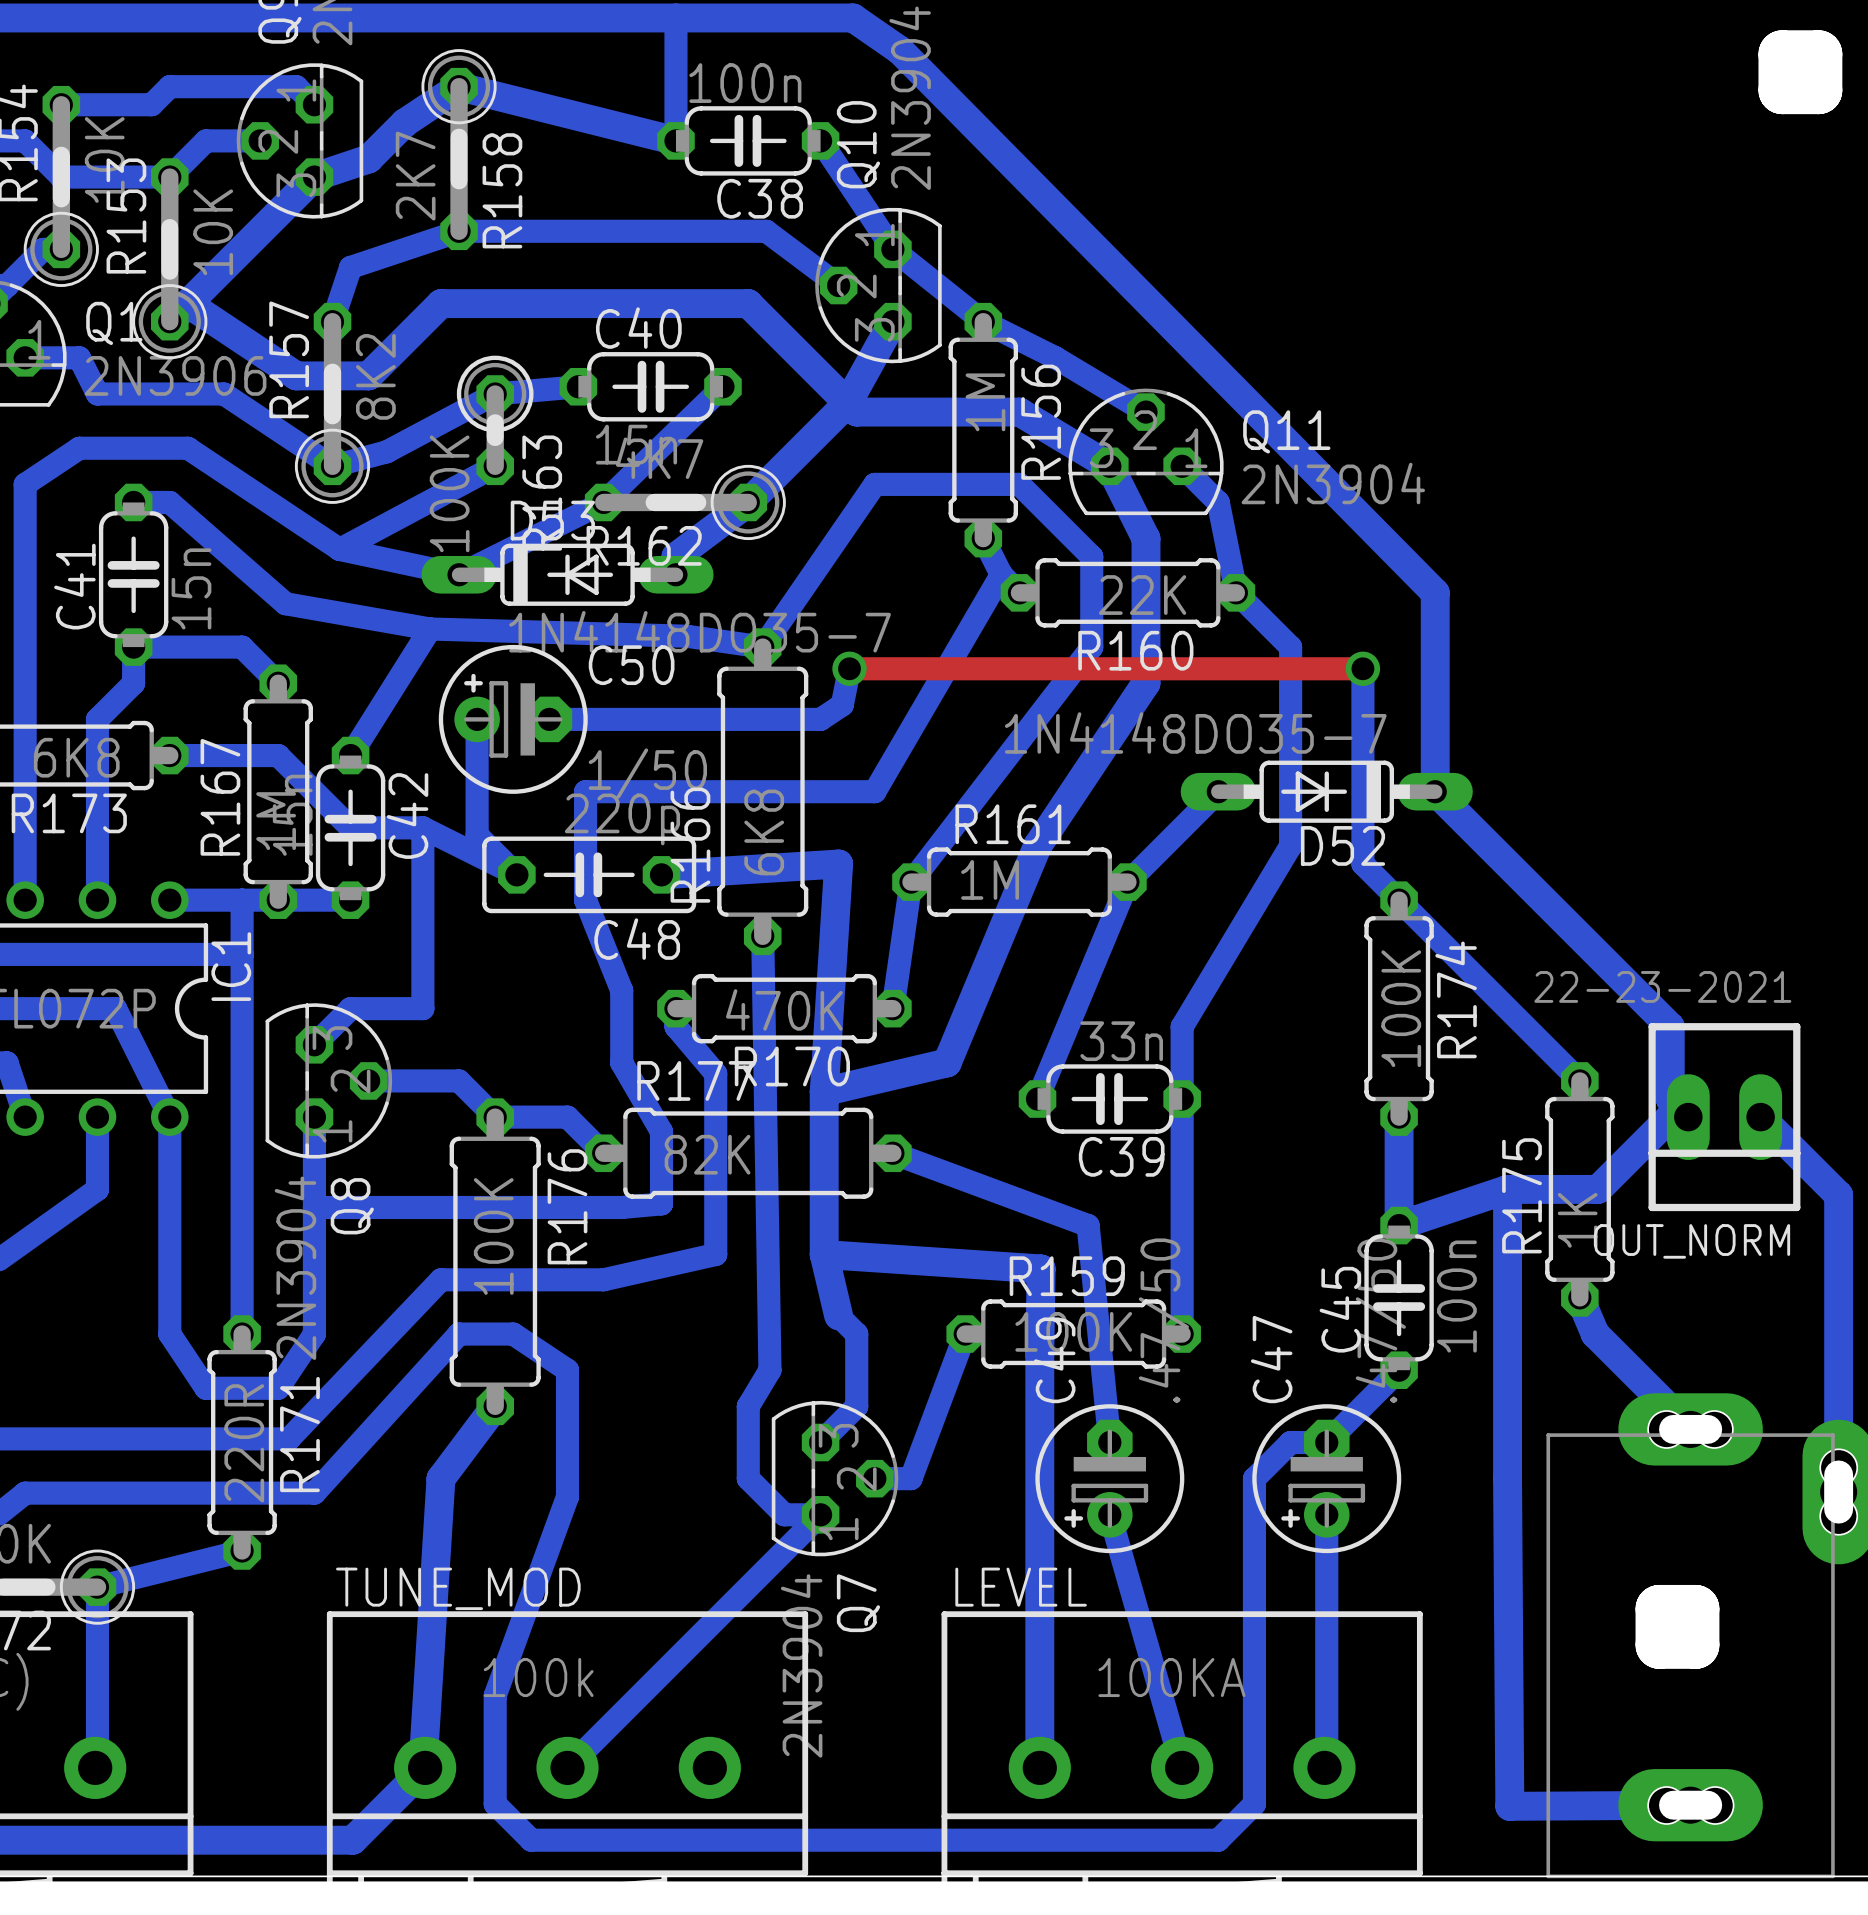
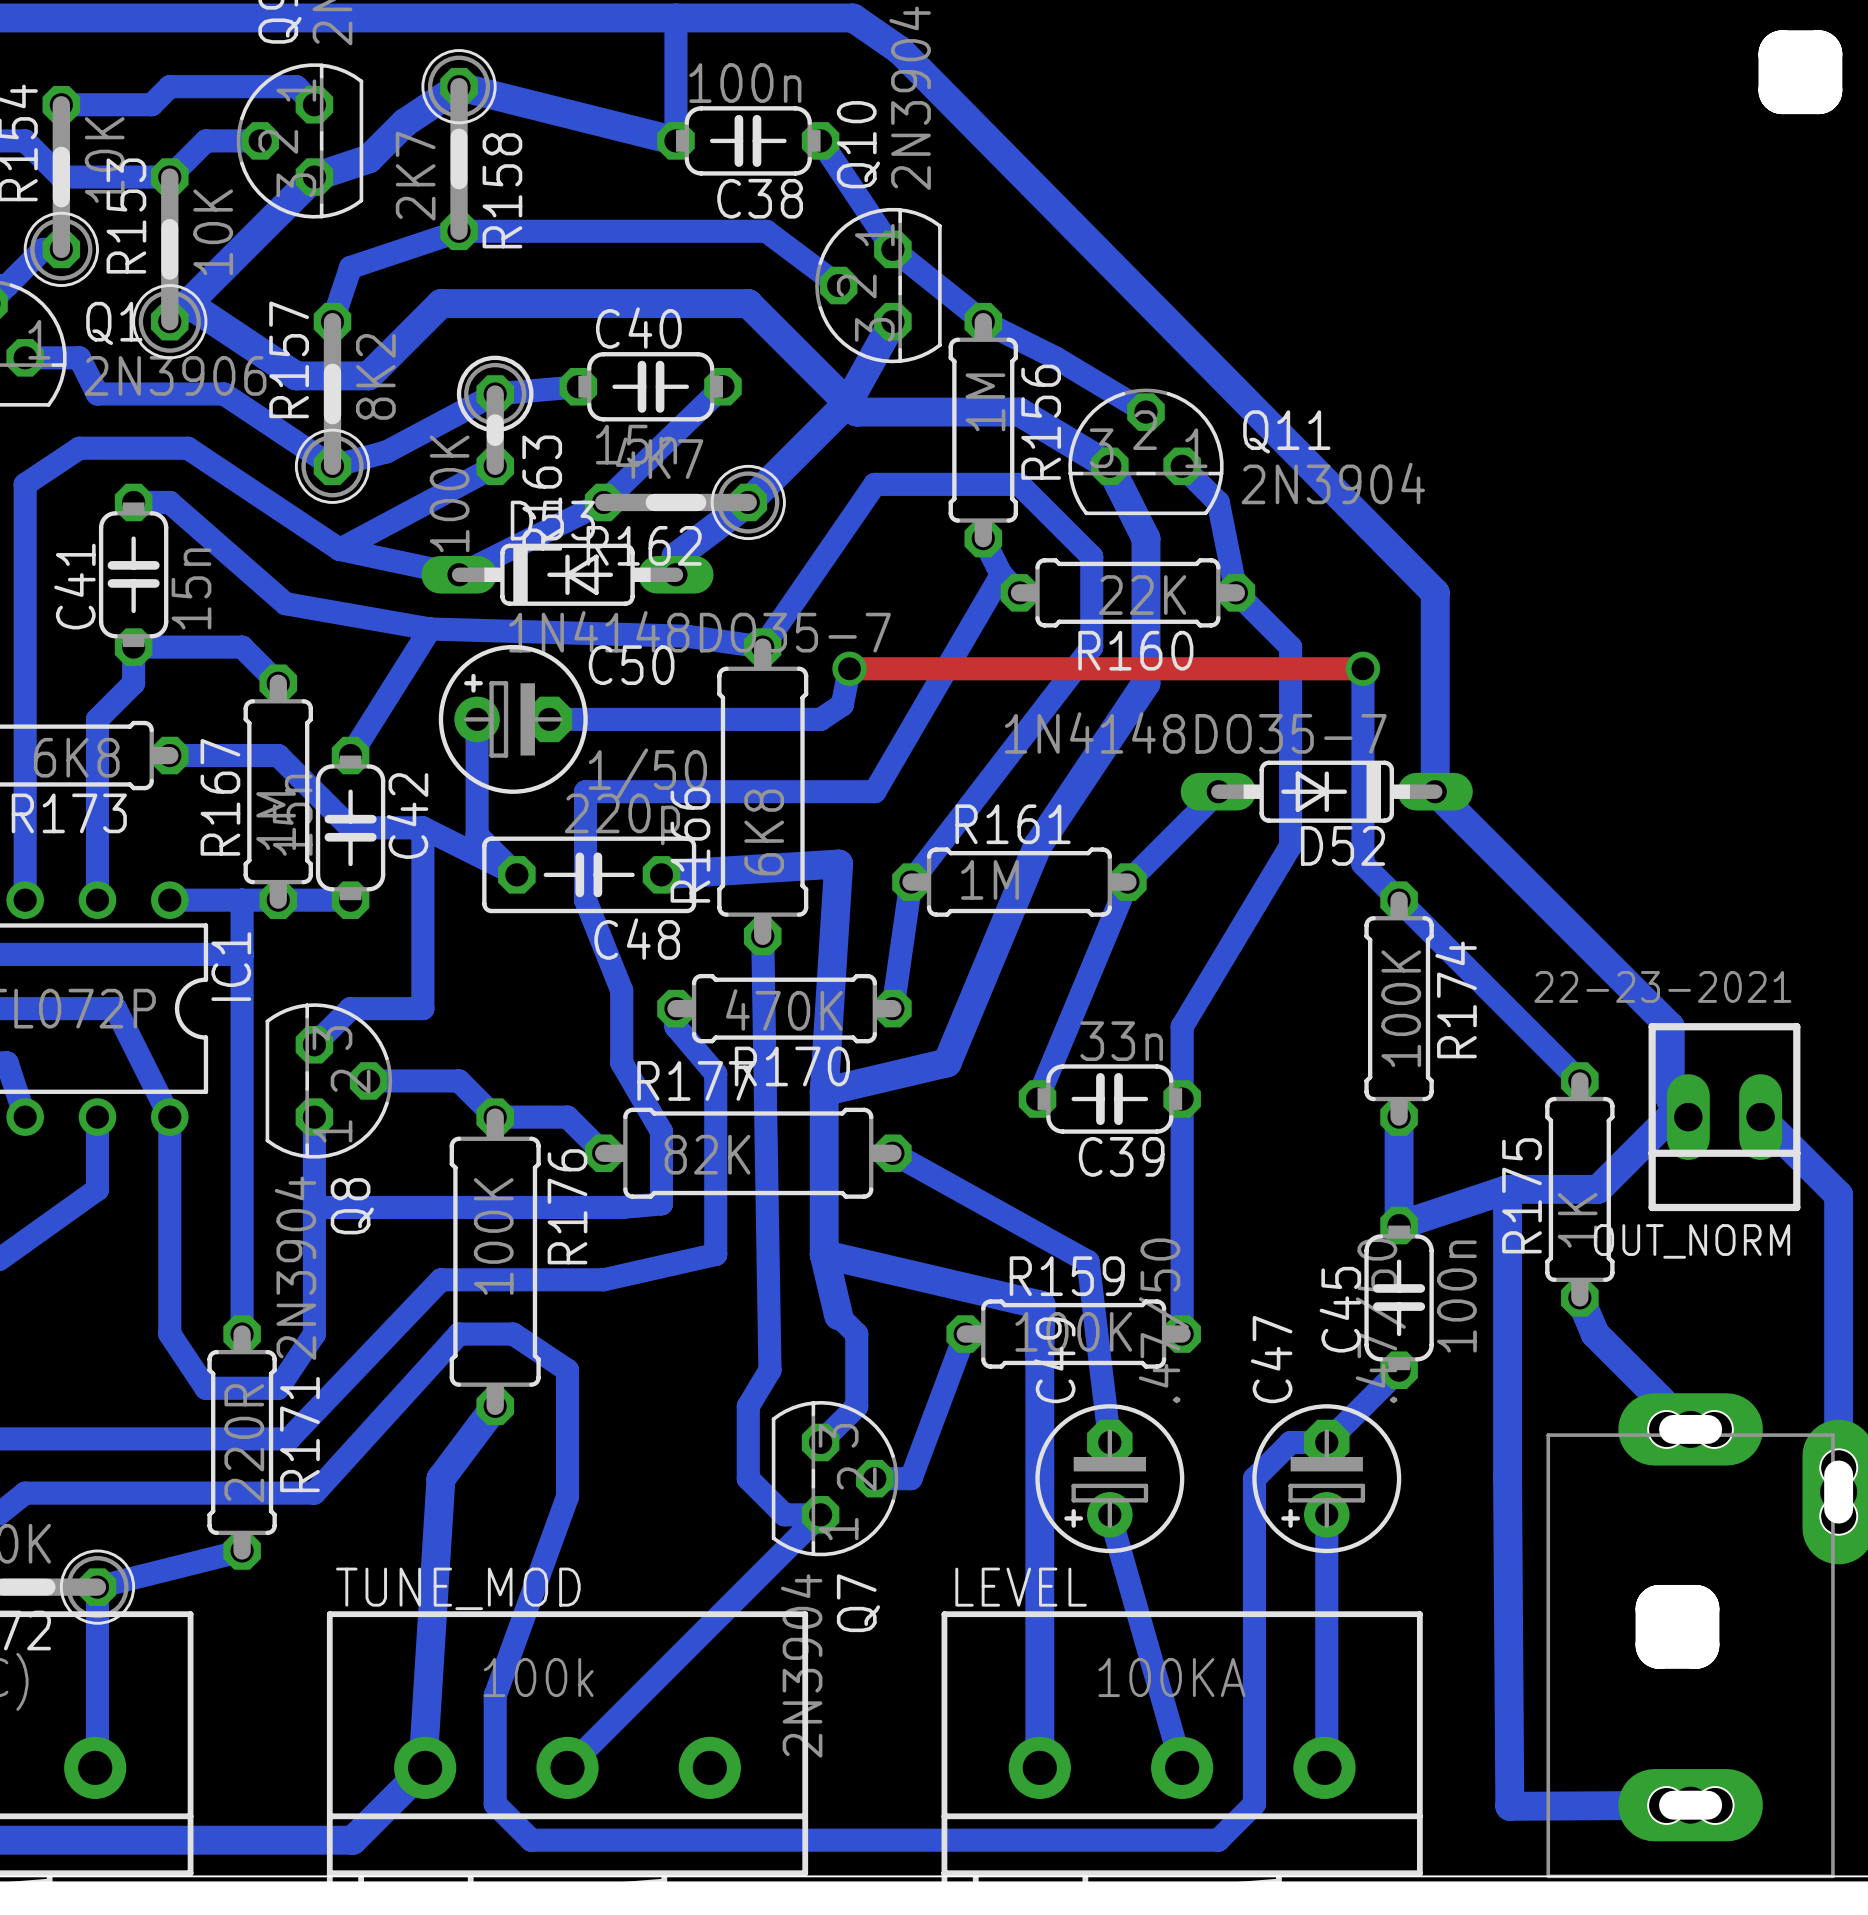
bottom track: (892, 1153) (1088, 1225) (1109, 1442) -> (892, 1153) (1088, 1261) (1109, 1442)
bottom track: (824, 1254) (1041, 1268) (1039, 1354) -> (824, 1254) (1041, 1305) (1039, 1354)

